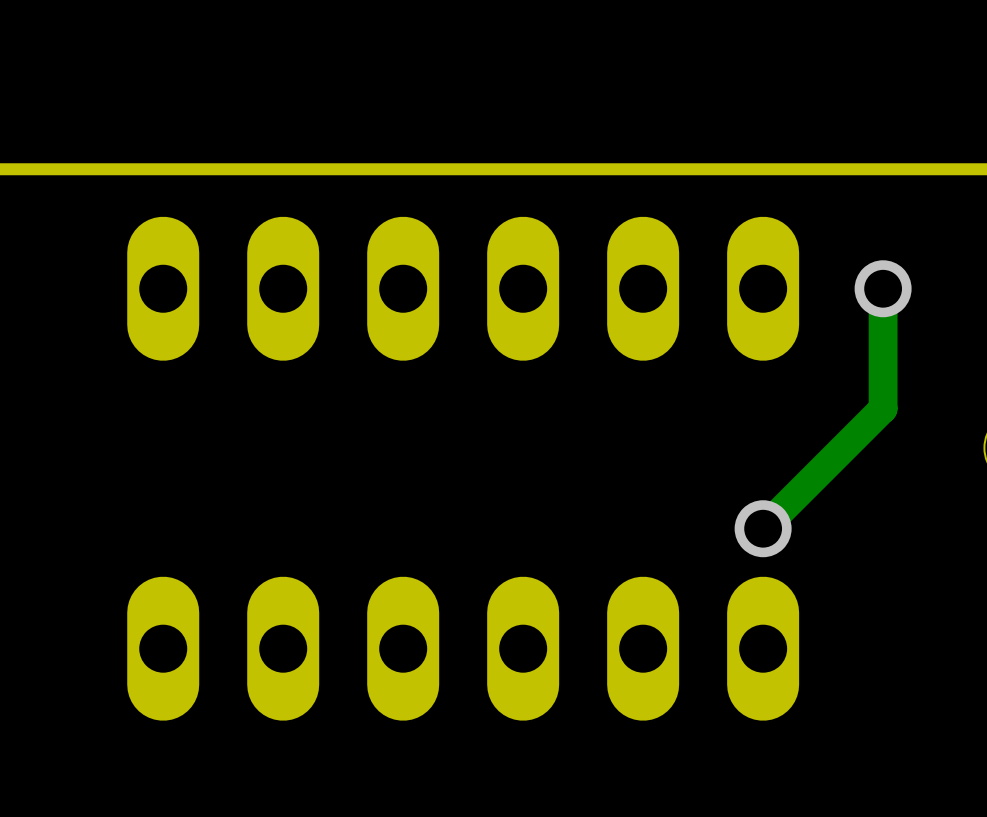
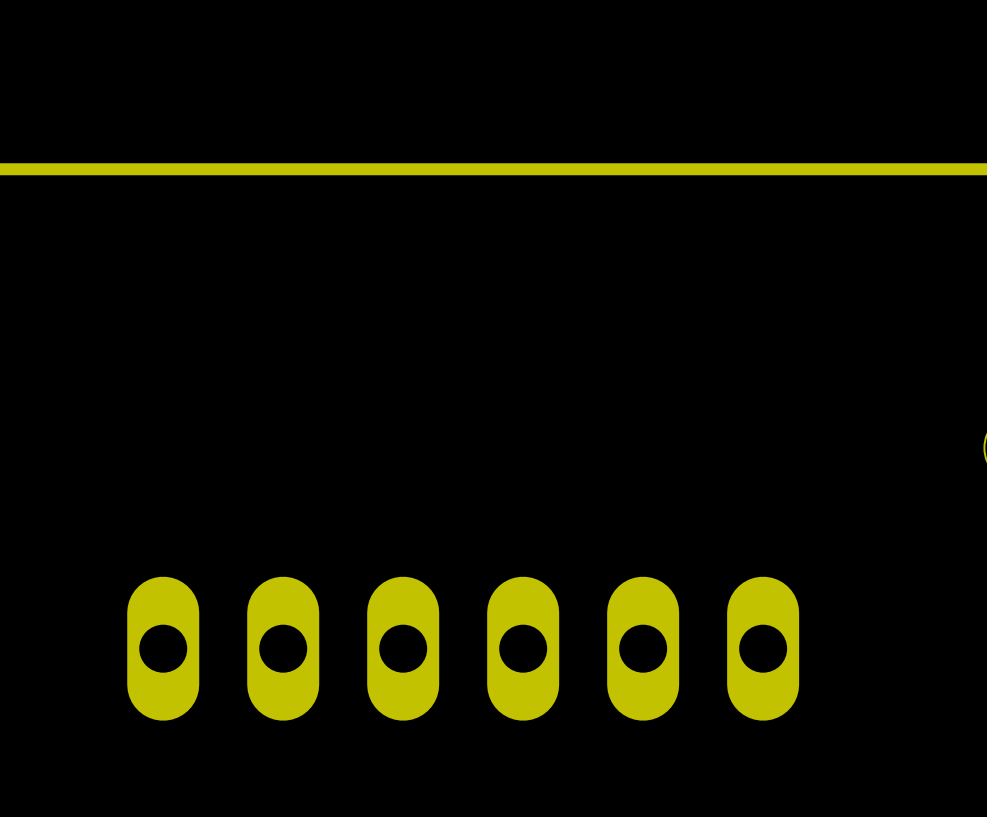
part: (463, 288) -> none
track: (883, 288) (883, 408) (763, 528) -> none
via: (883, 288) -> none
via: (763, 528) -> none

